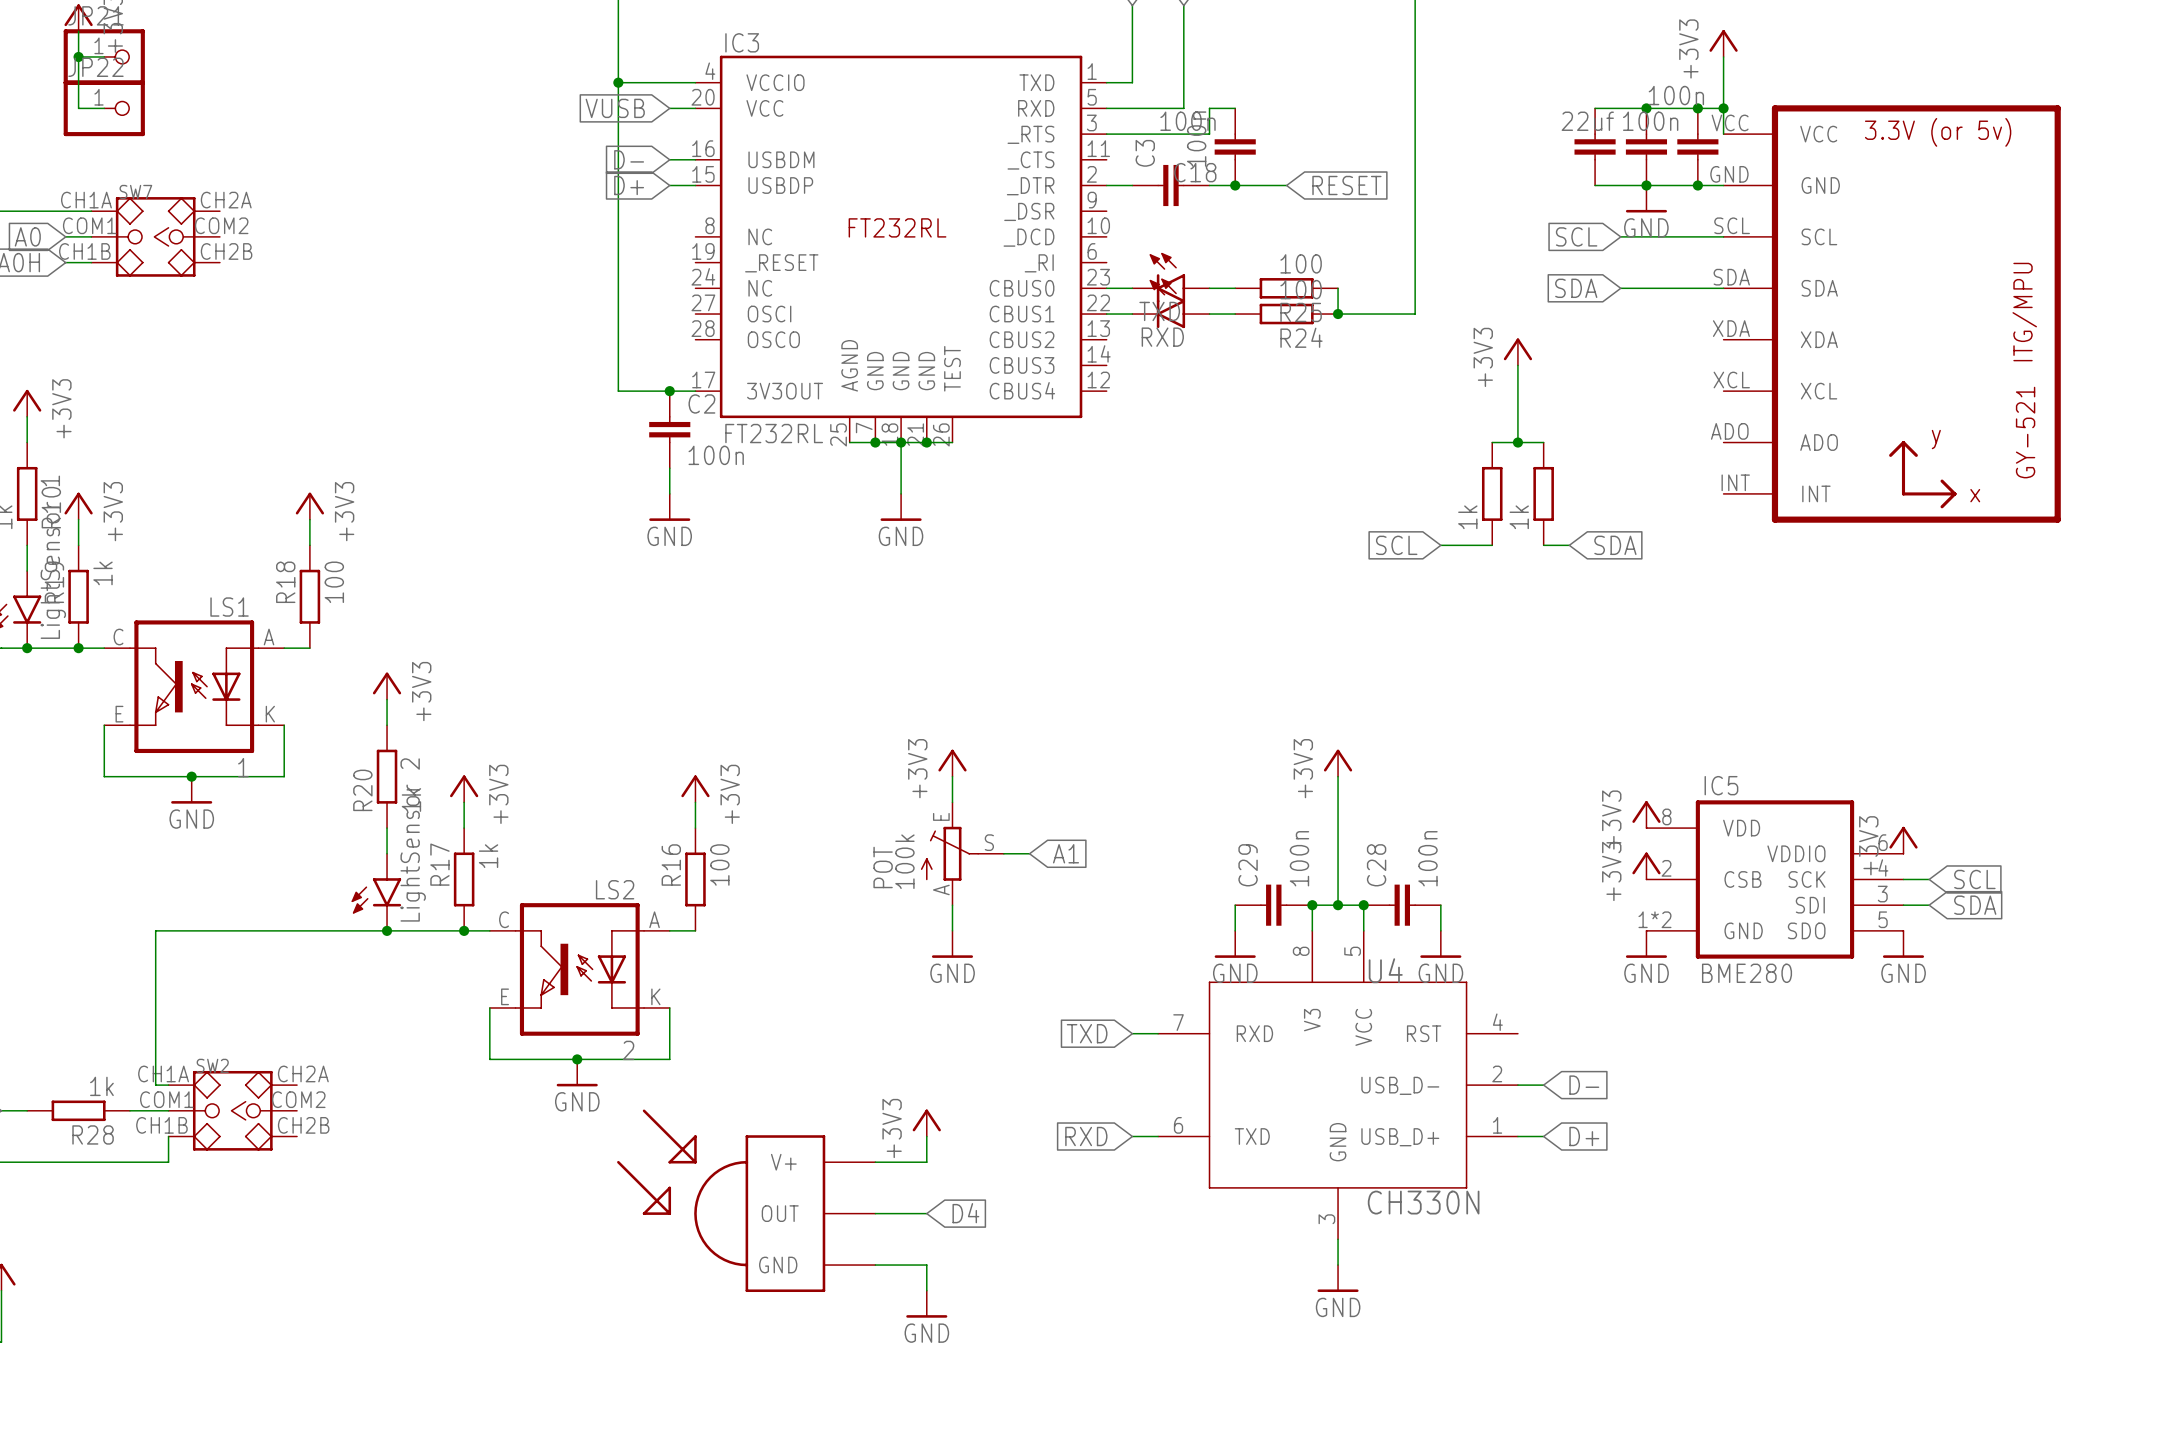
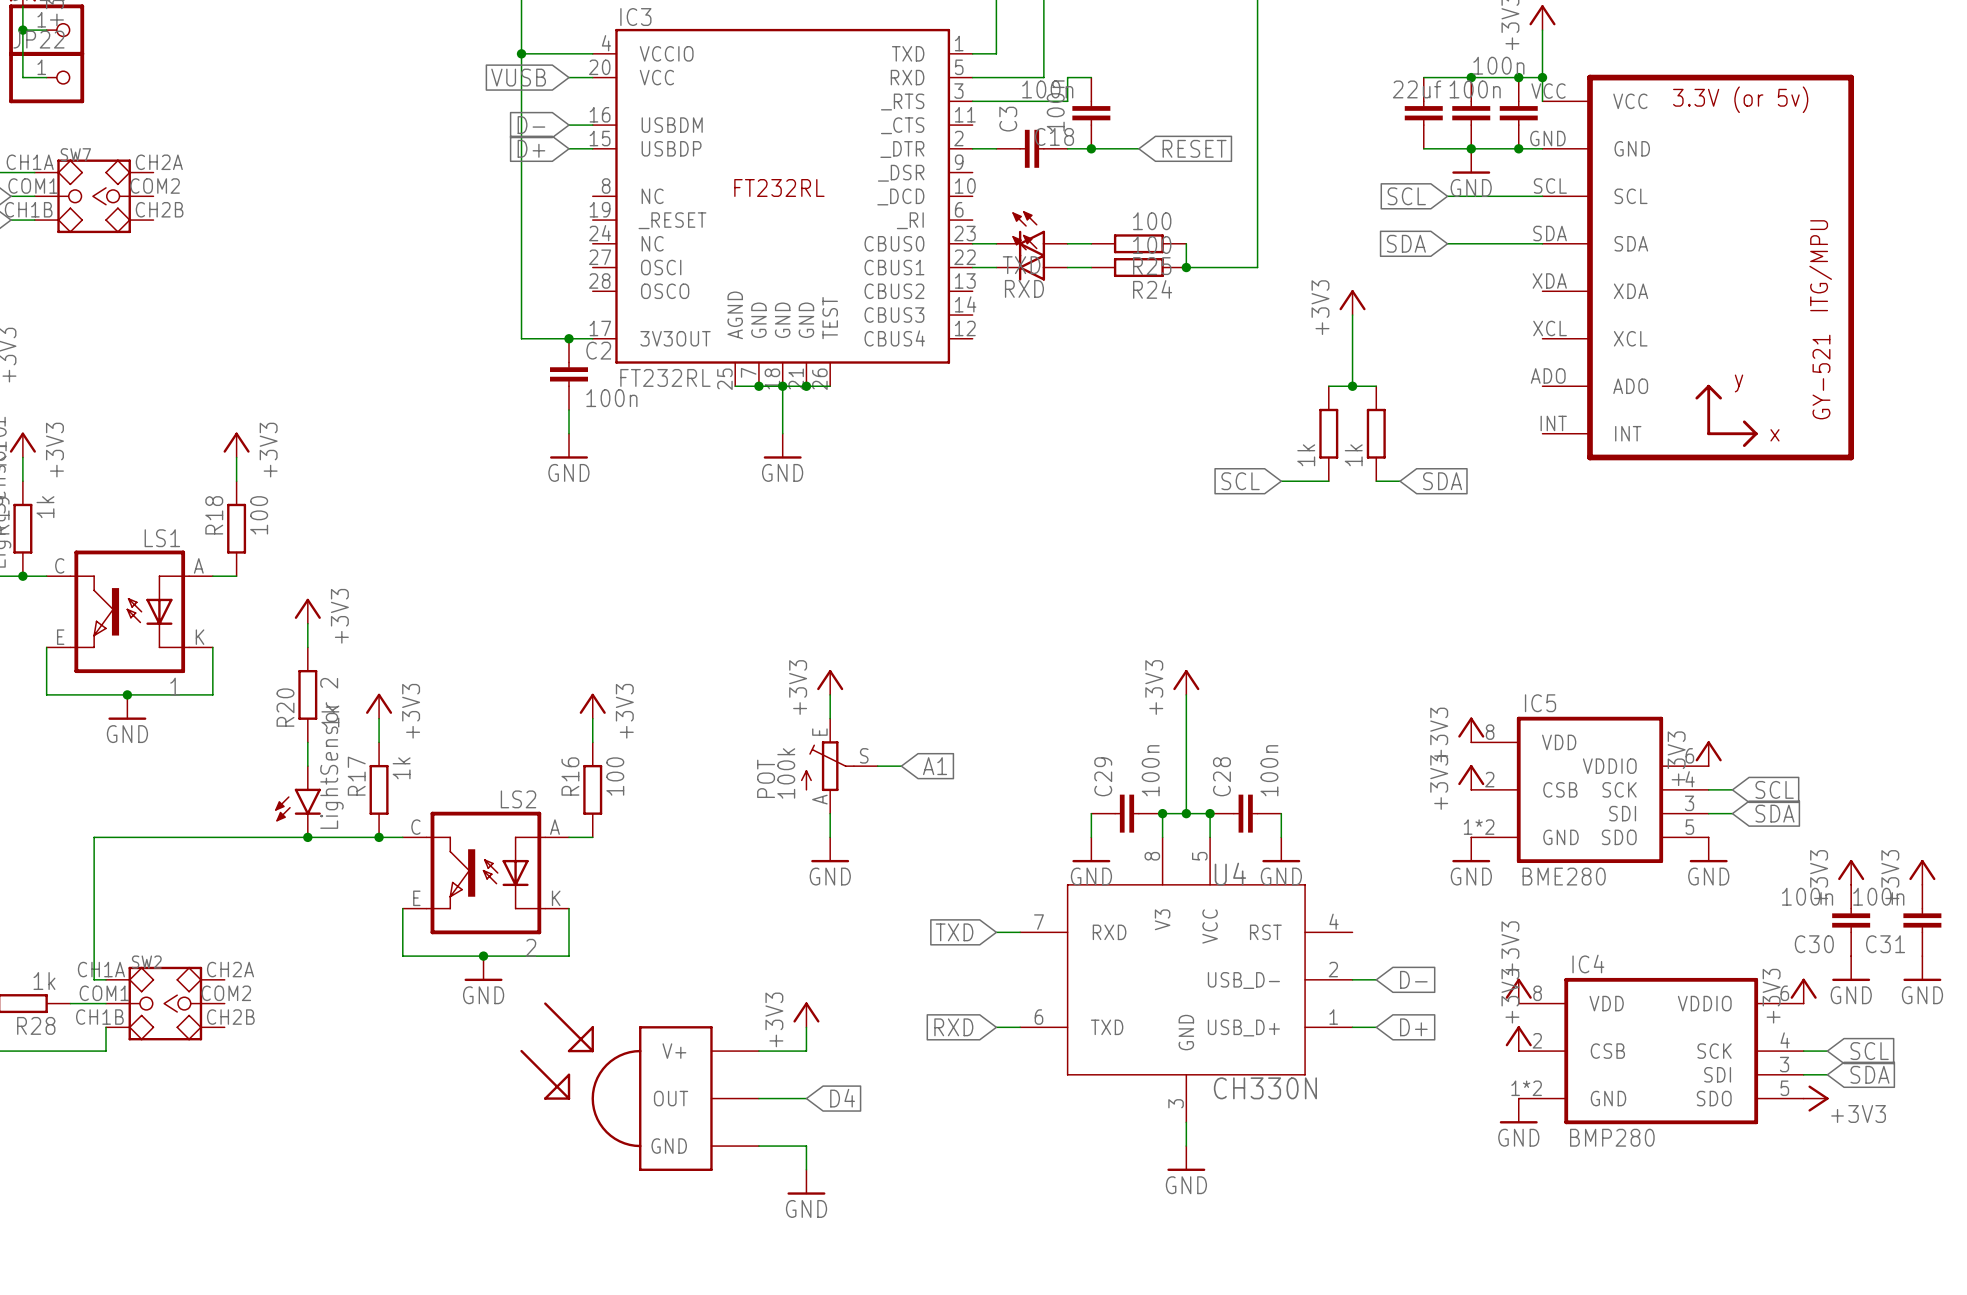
power symbol: none -> +3V3 (1851, 872)
power symbol: none -> +3V3 (1922, 872)
C30: none -> 100n (1851, 920)
C31: none -> 100n (1922, 920)
power symbol: none -> GND (1851, 968)
power symbol: none -> GND (1922, 968)
power symbol: none -> +3V3 (1518, 991)
power symbol: none -> +3V3 (1803, 991)
power symbol: none -> +3V3 (1518, 1038)
IC4: none -> BMP280 (1661, 1051)
wire: none -> (1803, 1051) (1827, 1051)
global label: none -> SCL (1869, 1051)
wire: none -> (1803, 1074) (1827, 1074)
global label: none -> SDA (1869, 1074)
power symbol: none -> +3V3 (1816, 1098)
power symbol: none -> GND (1518, 1111)

